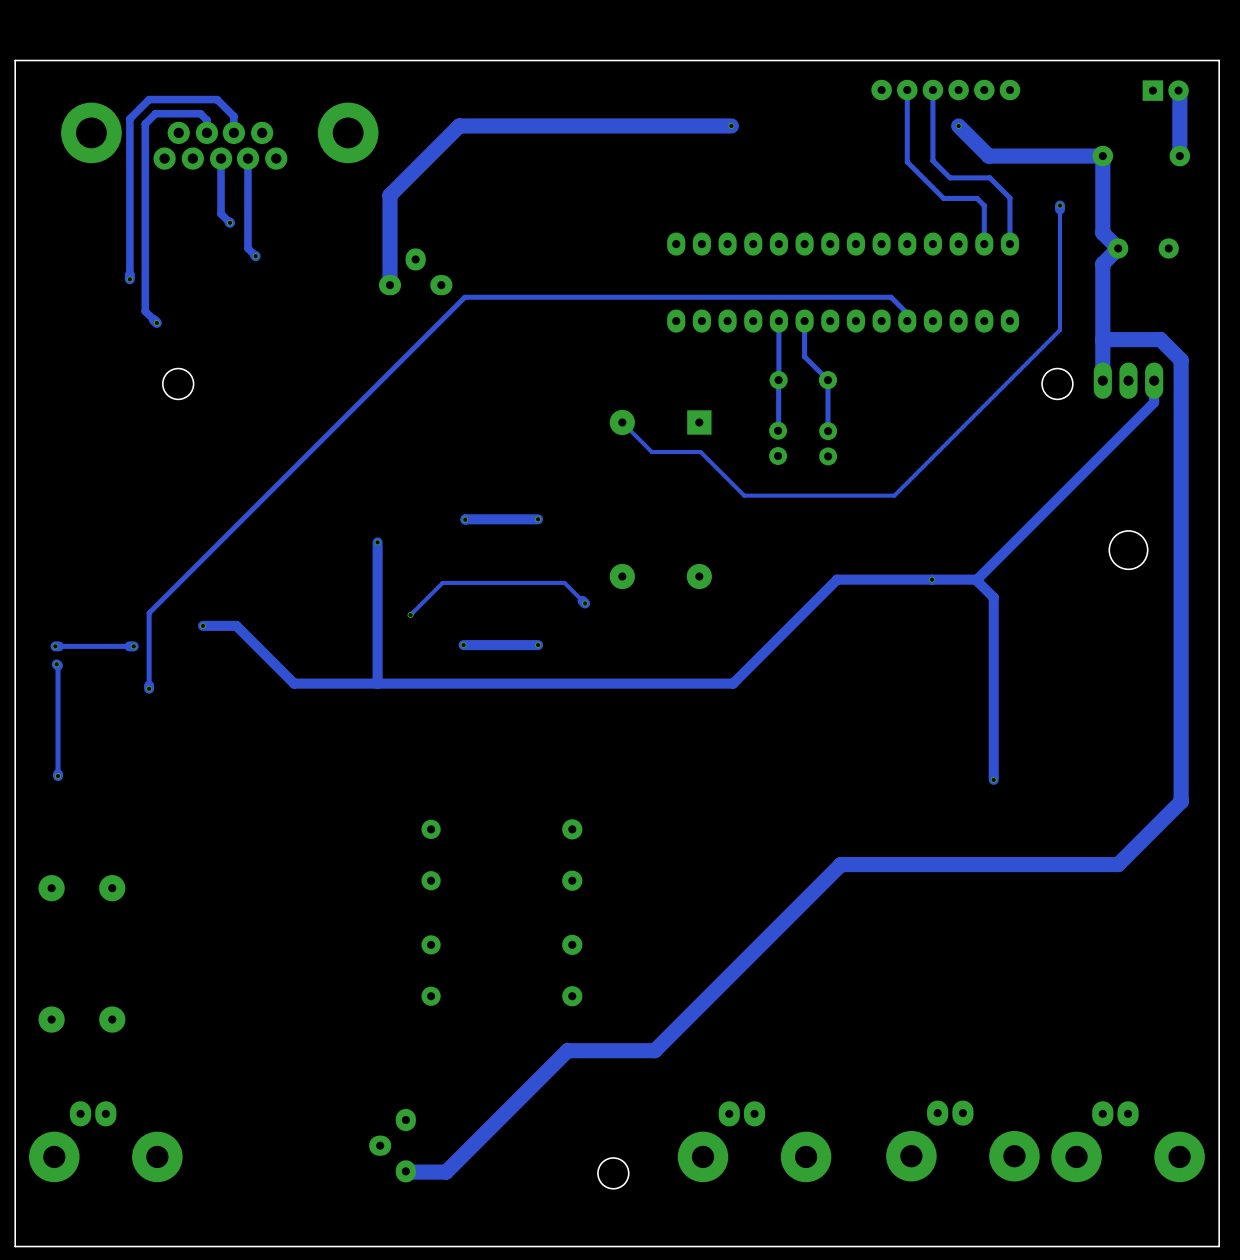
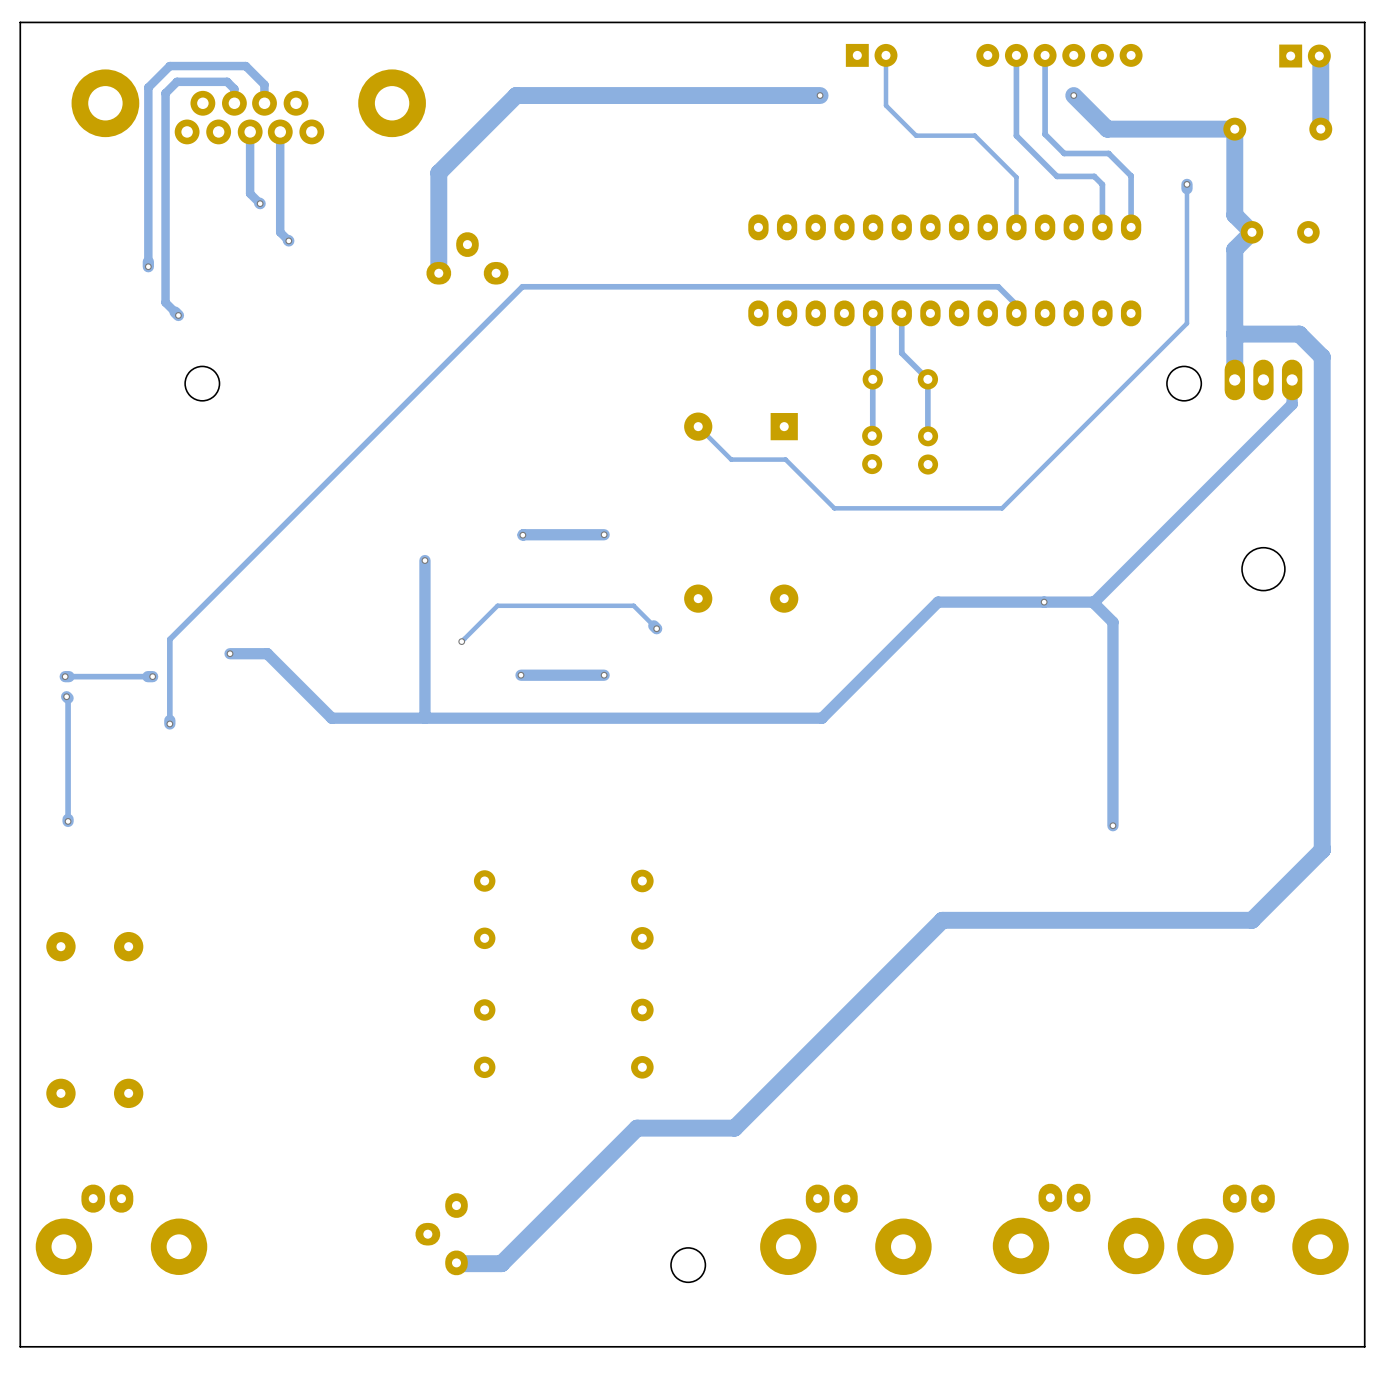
part: none -> (871, 55)
track: none -> (885, 55) (885, 105) (916, 135) (974, 135) (1016, 177) (1016, 227)

